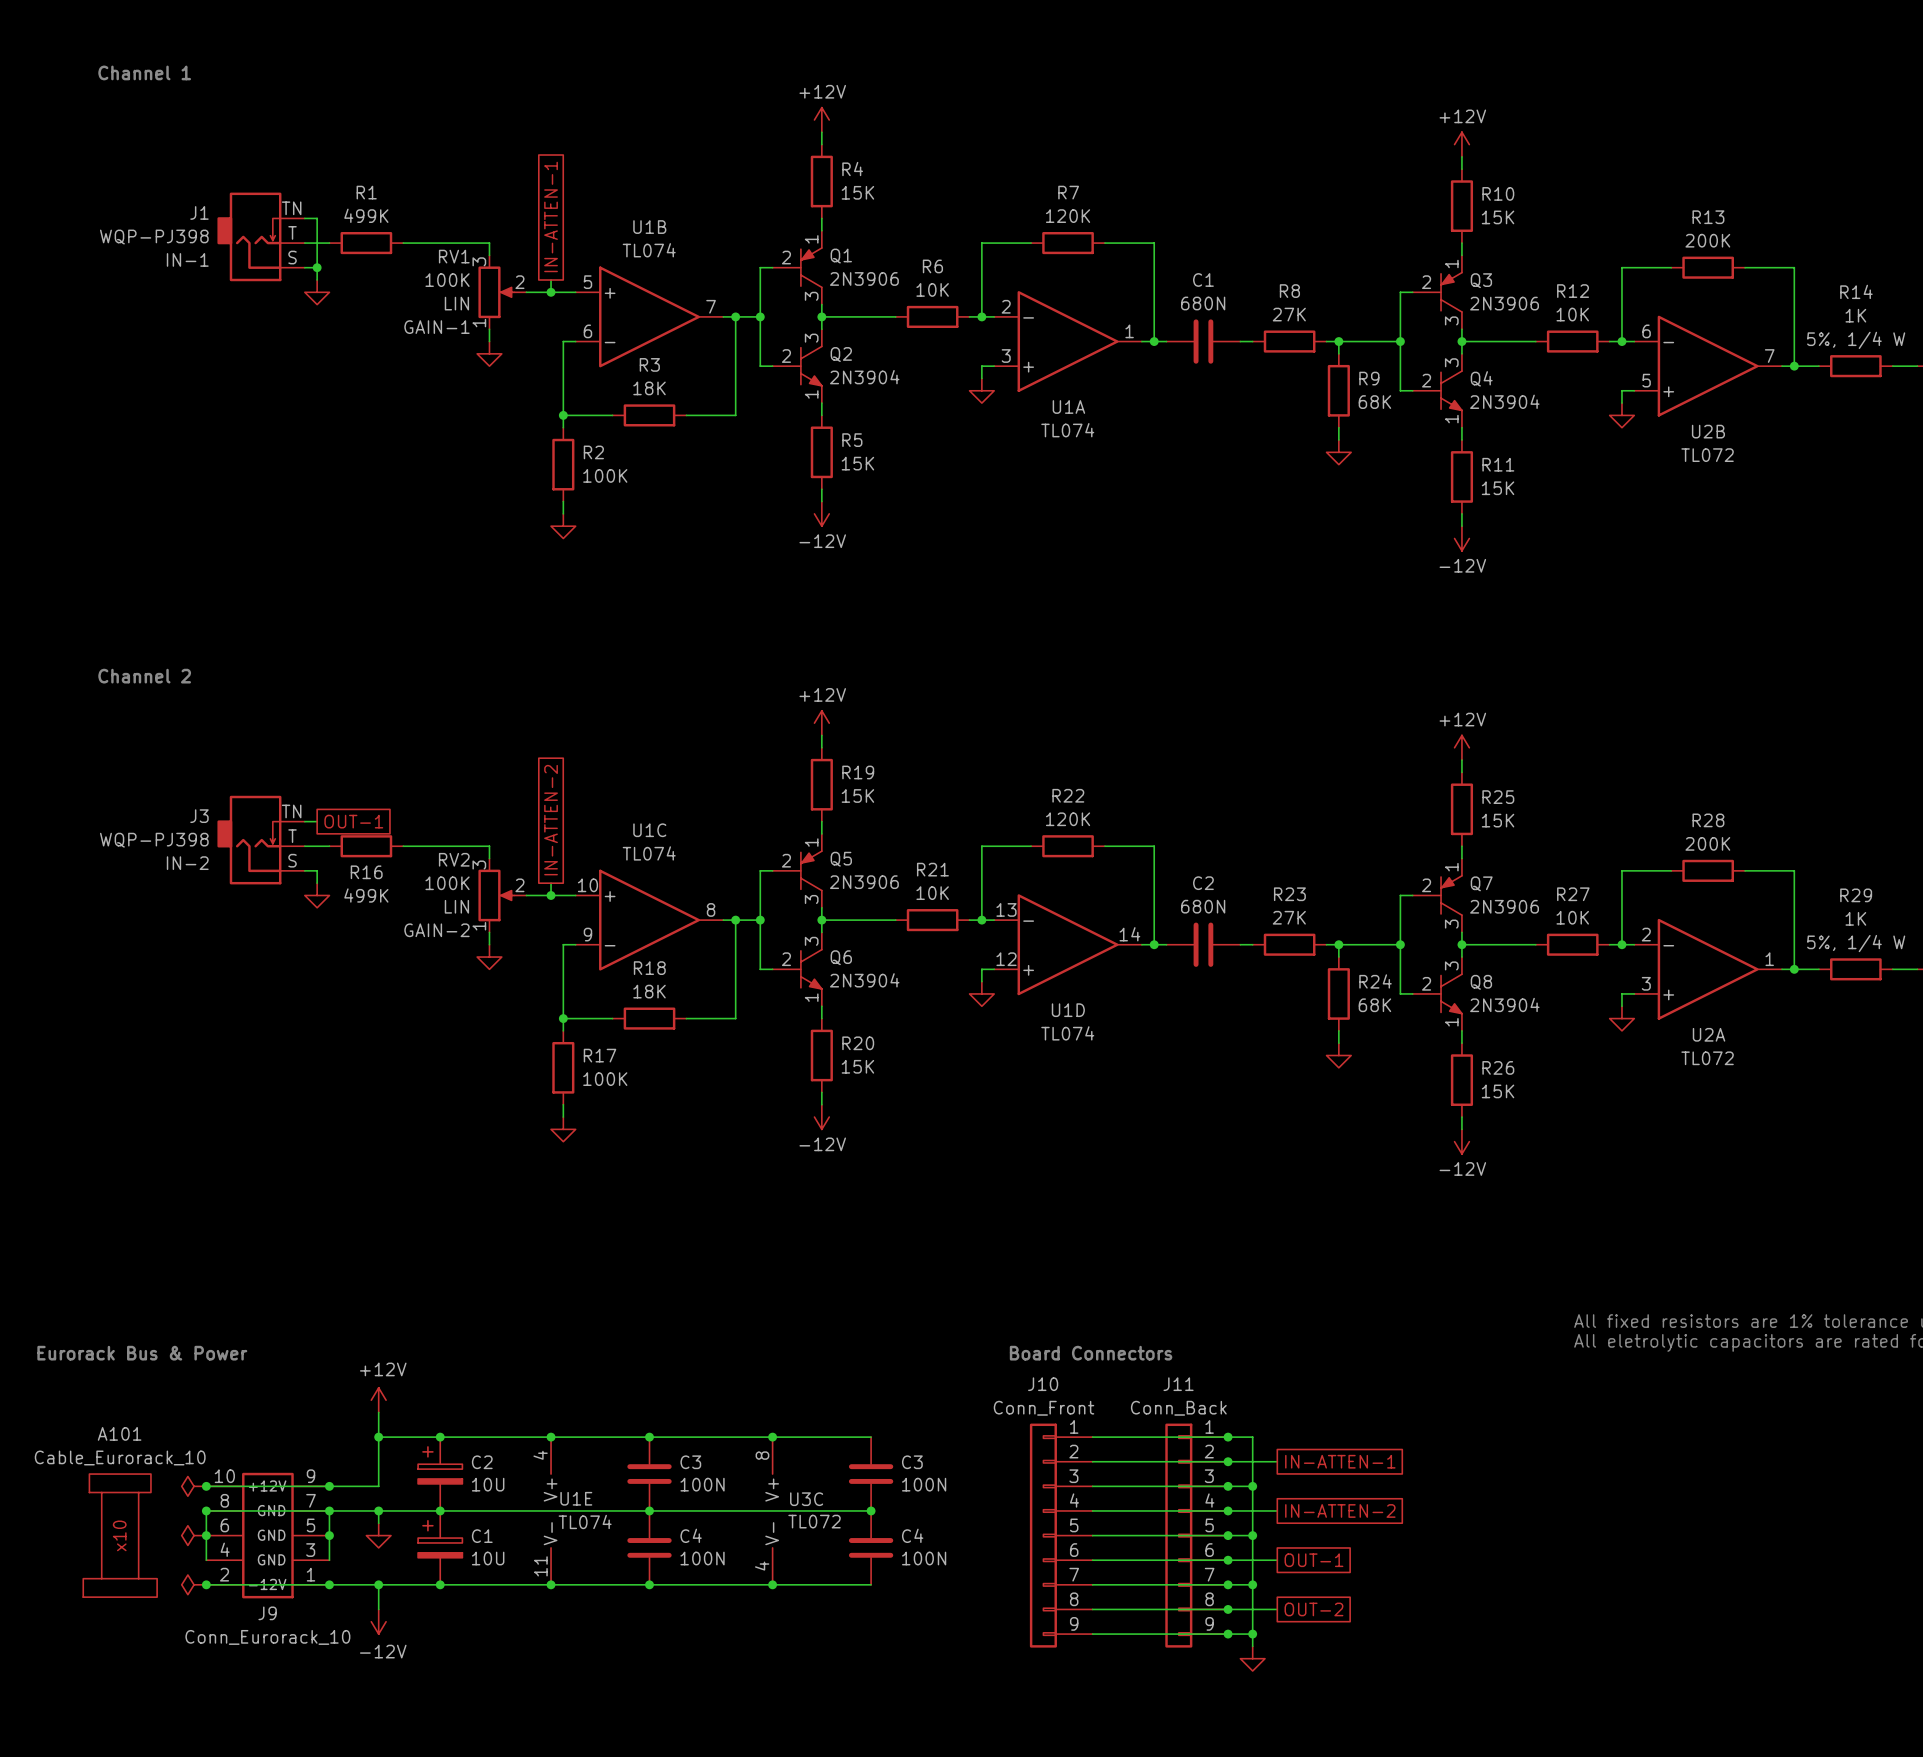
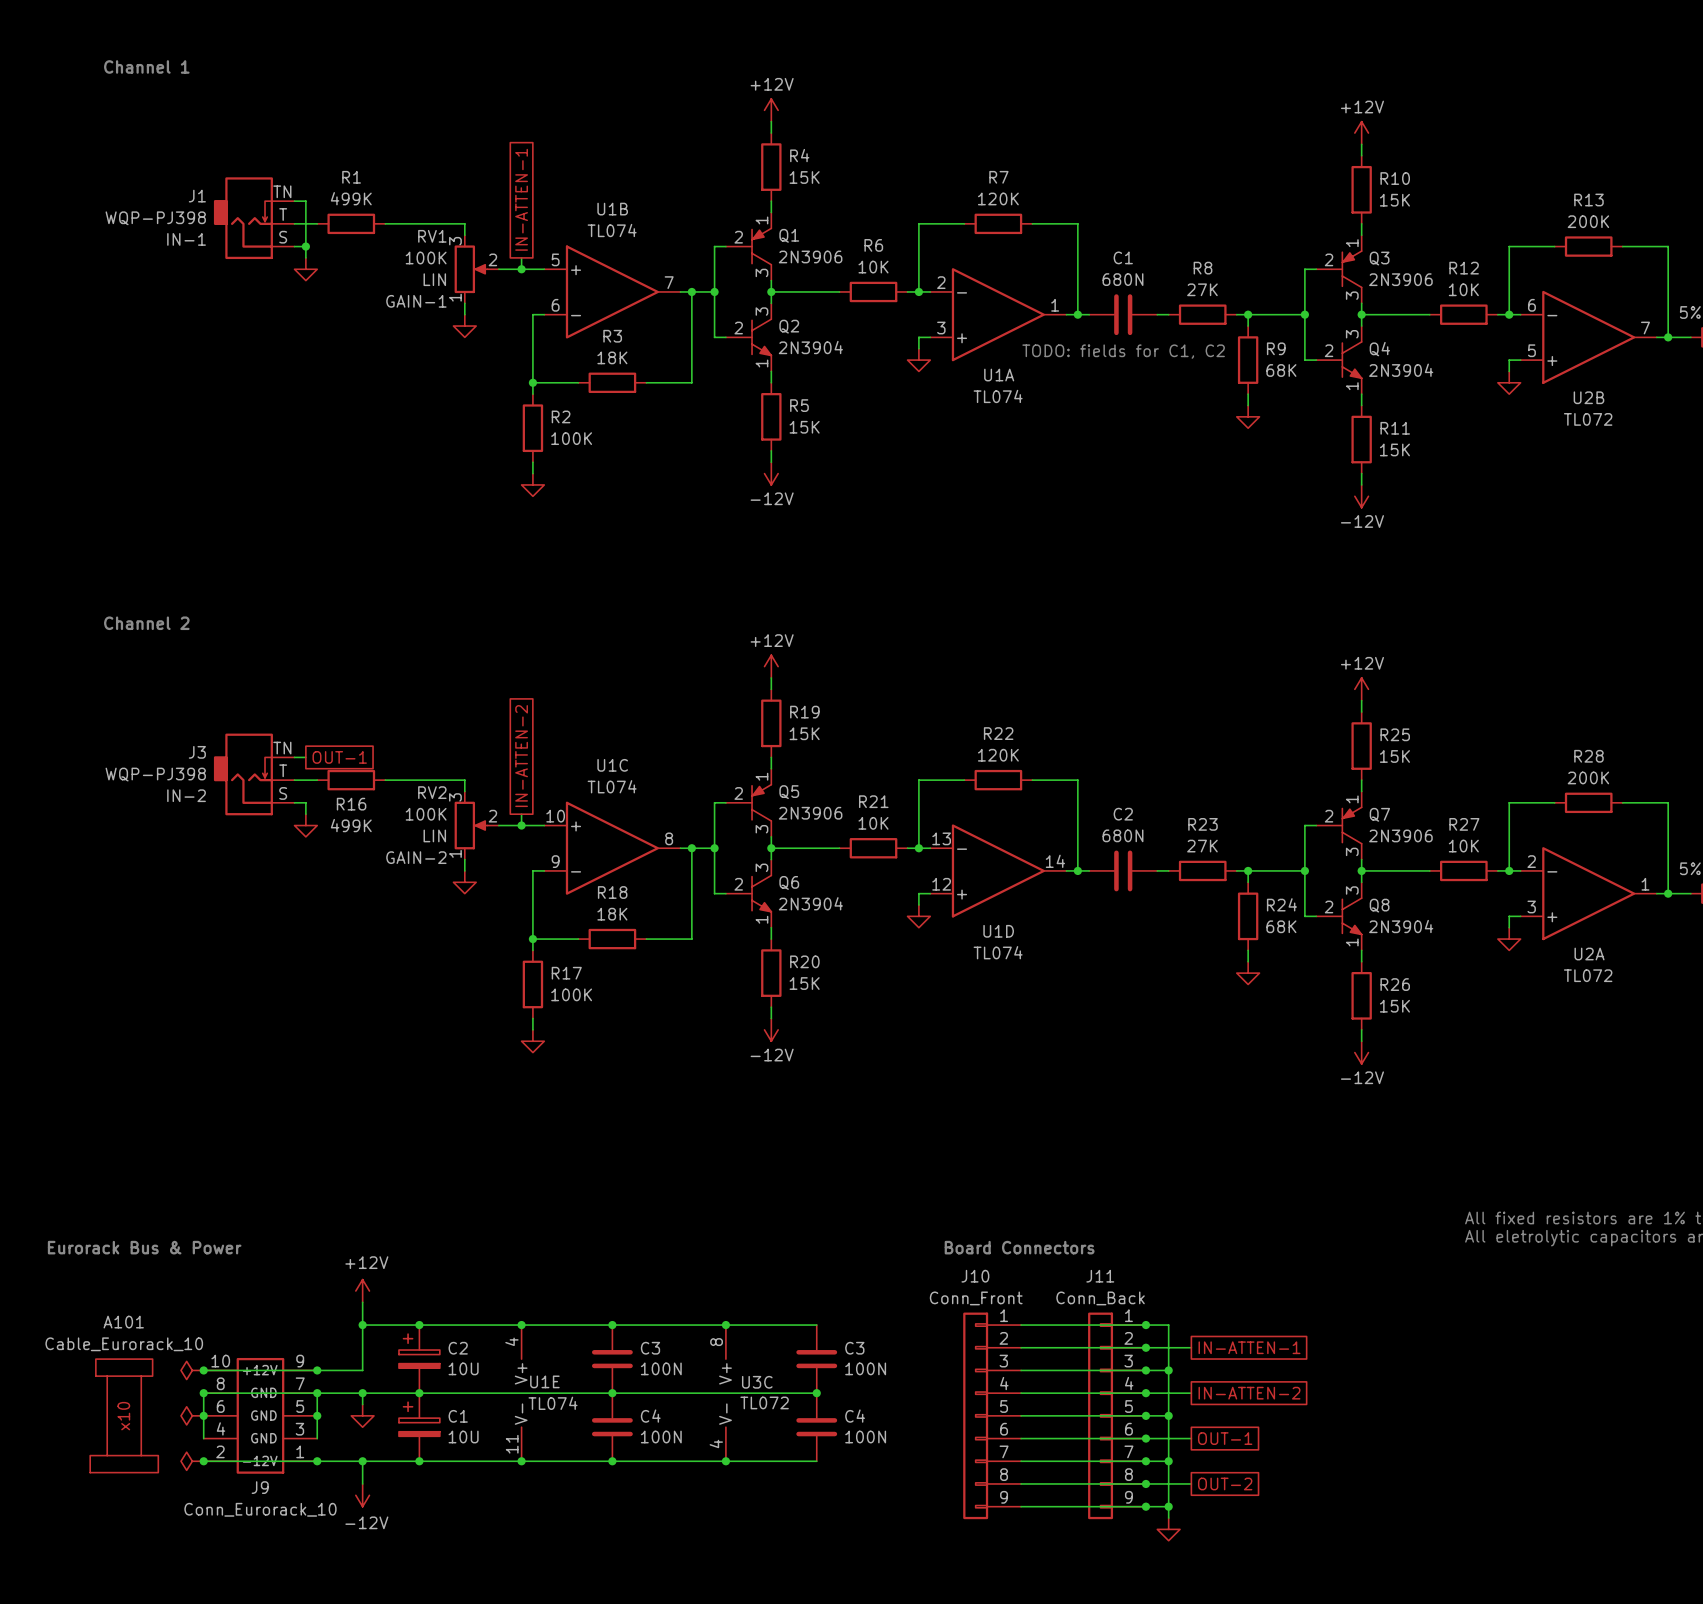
text: none -> TODO: fields for C1, C2 (1123, 351)

